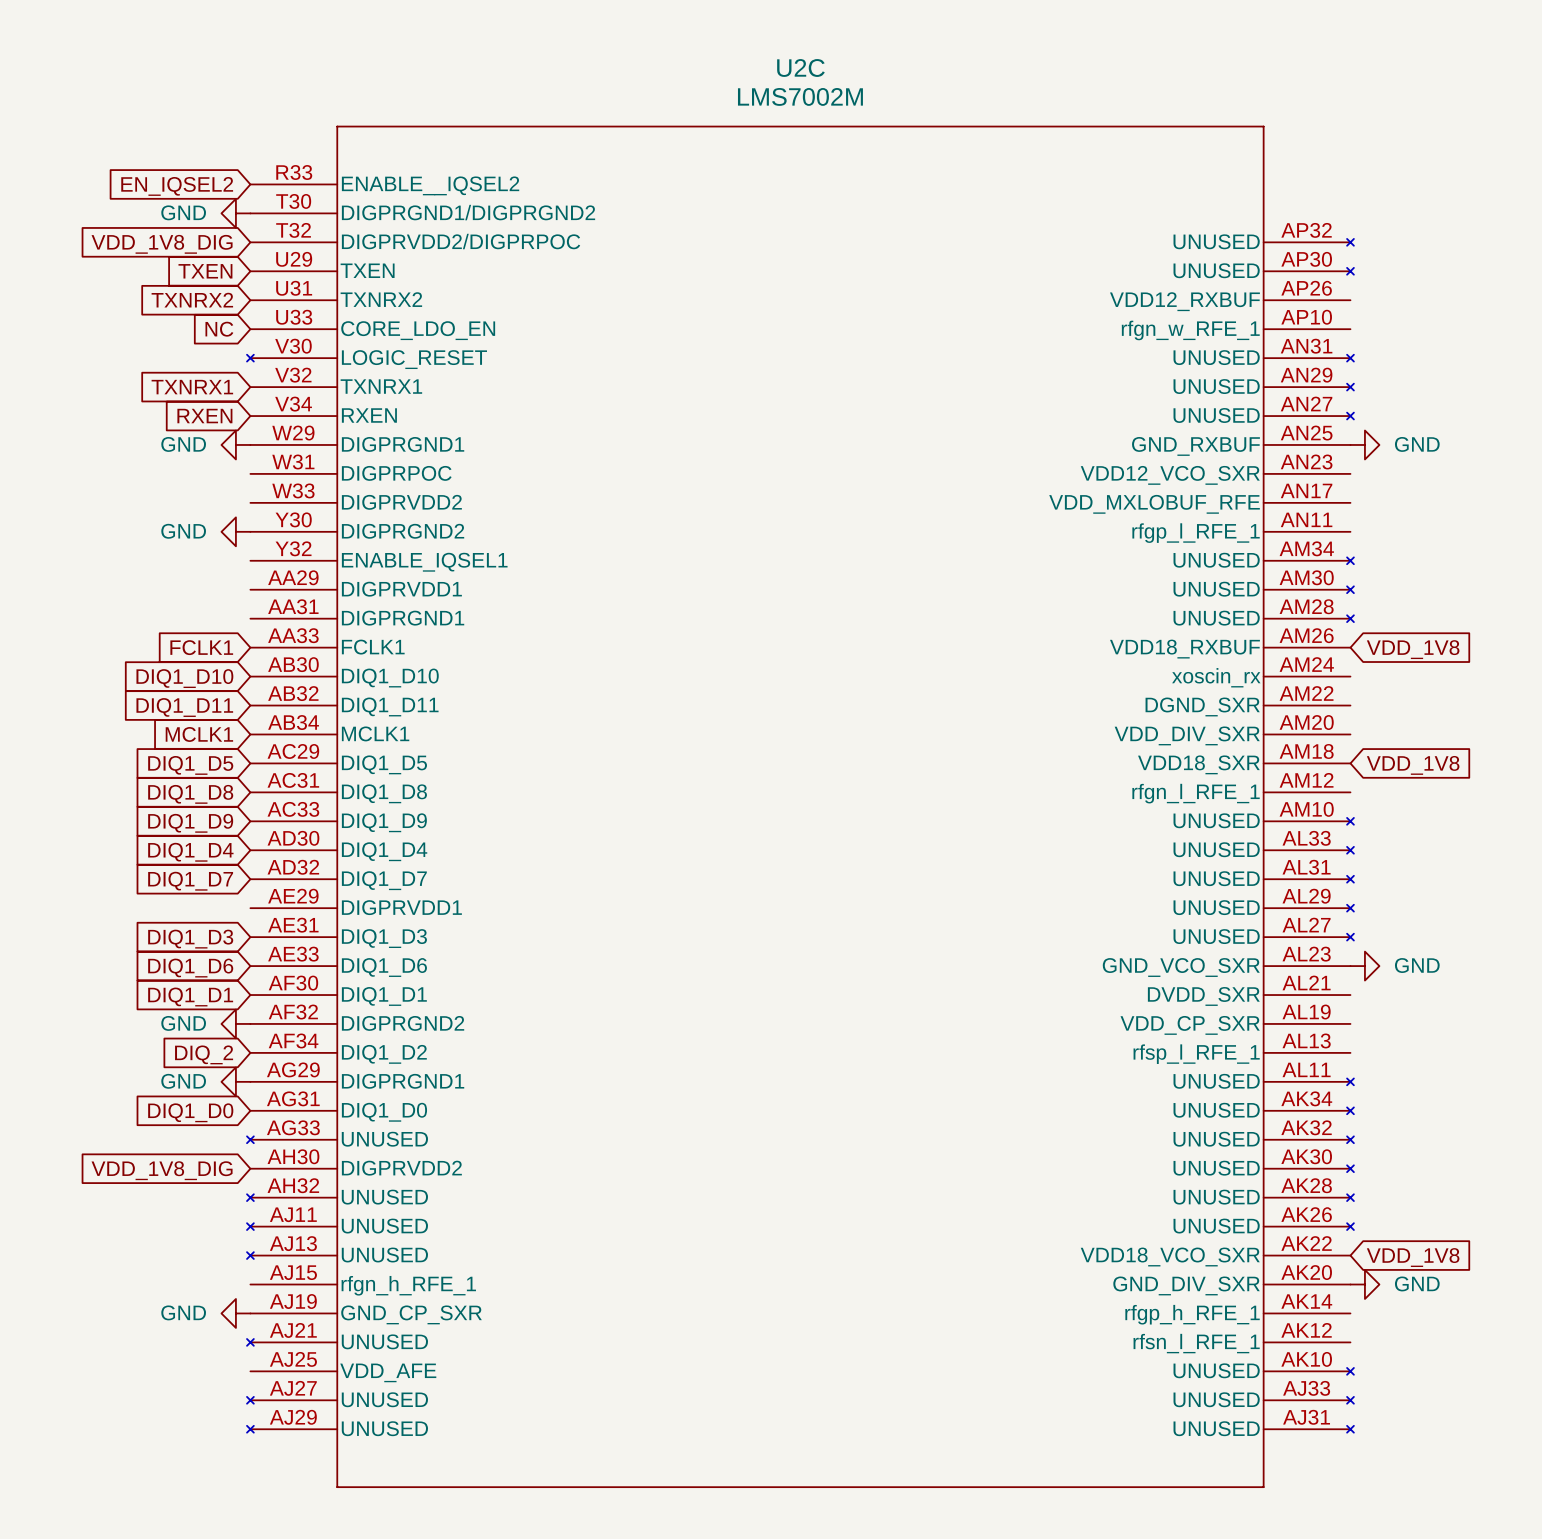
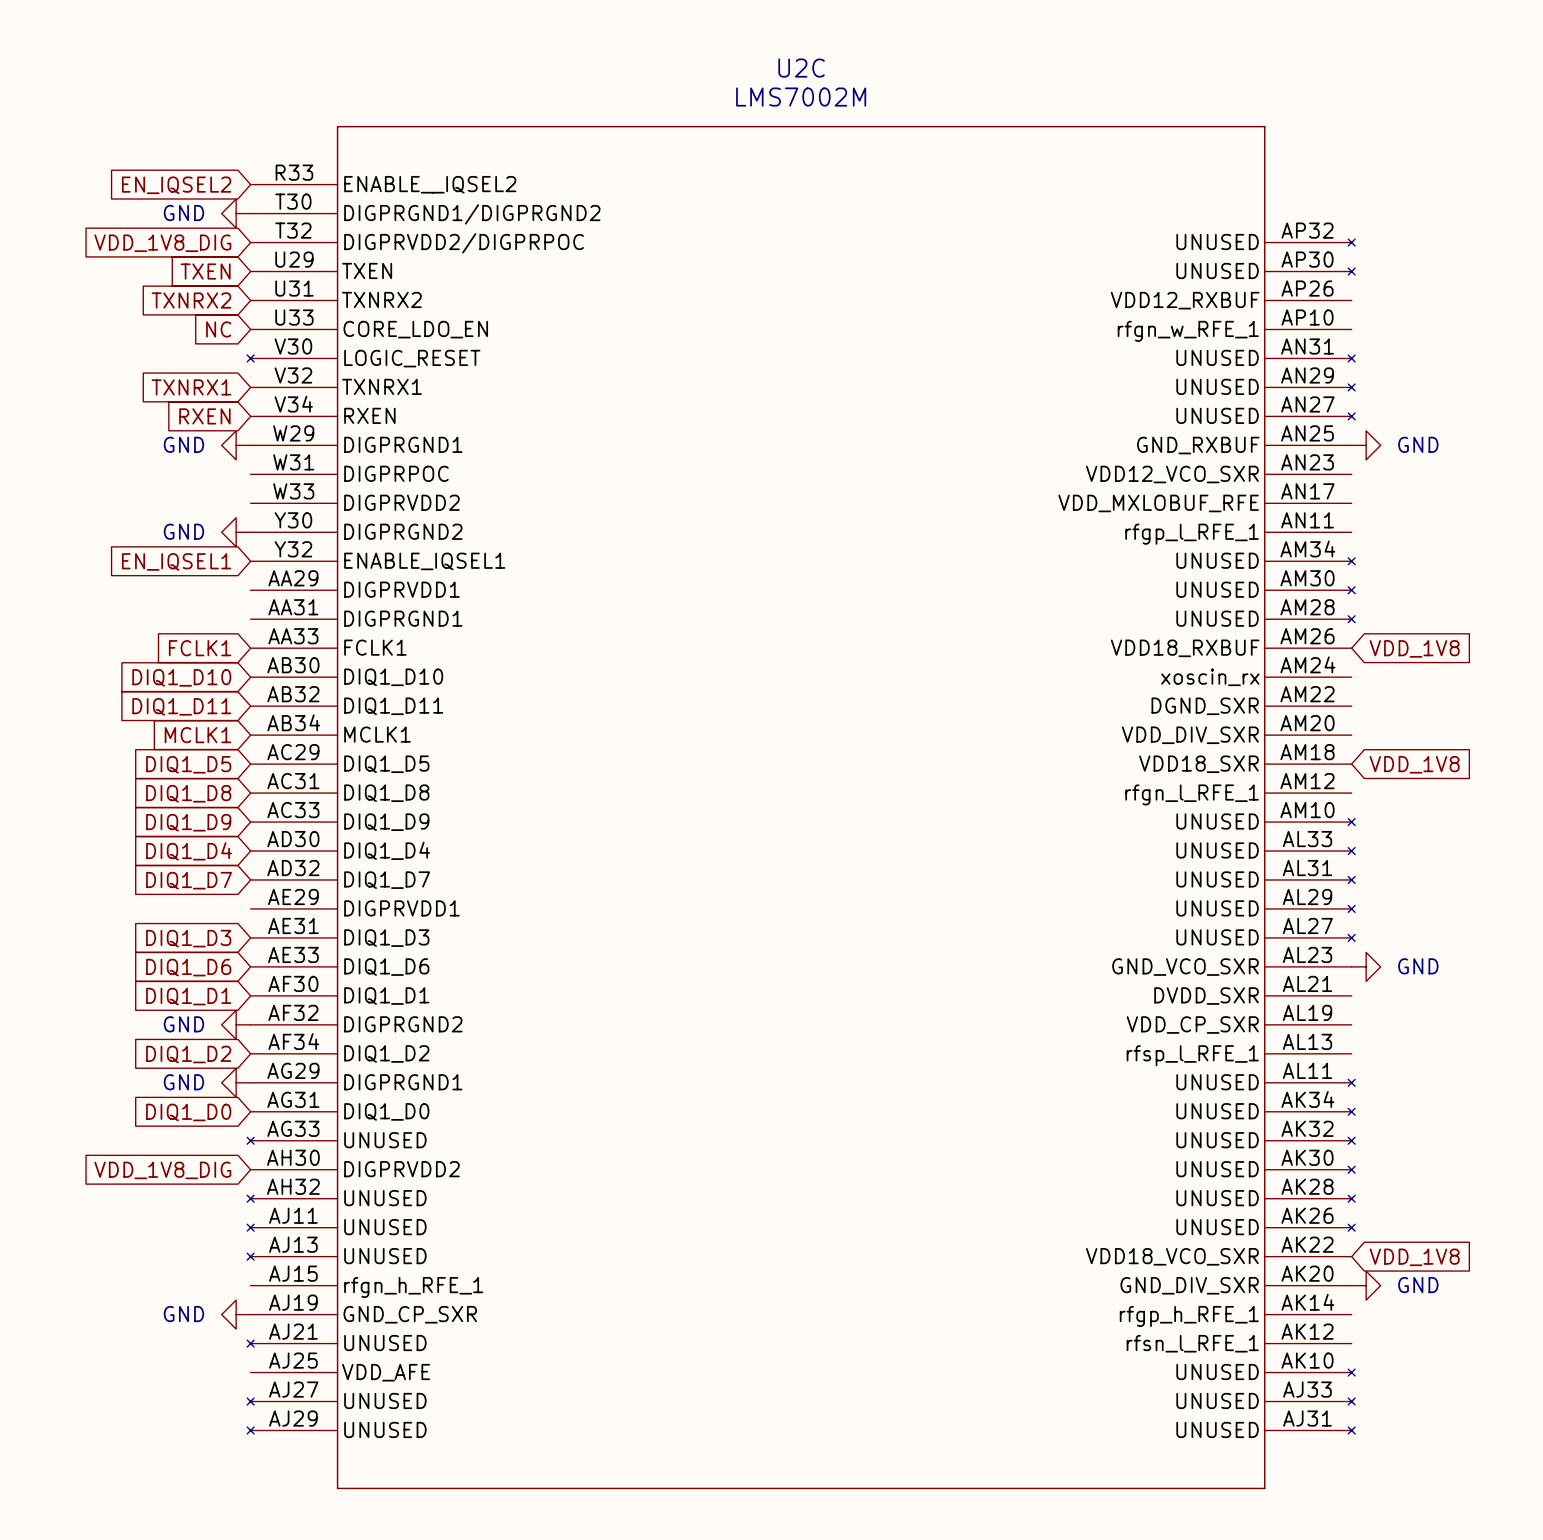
global label: none -> EN_IQSEL1 (176, 561)
global label: DIQ_2 (204, 1054) -> DIQ1_D2 (188, 1054)

